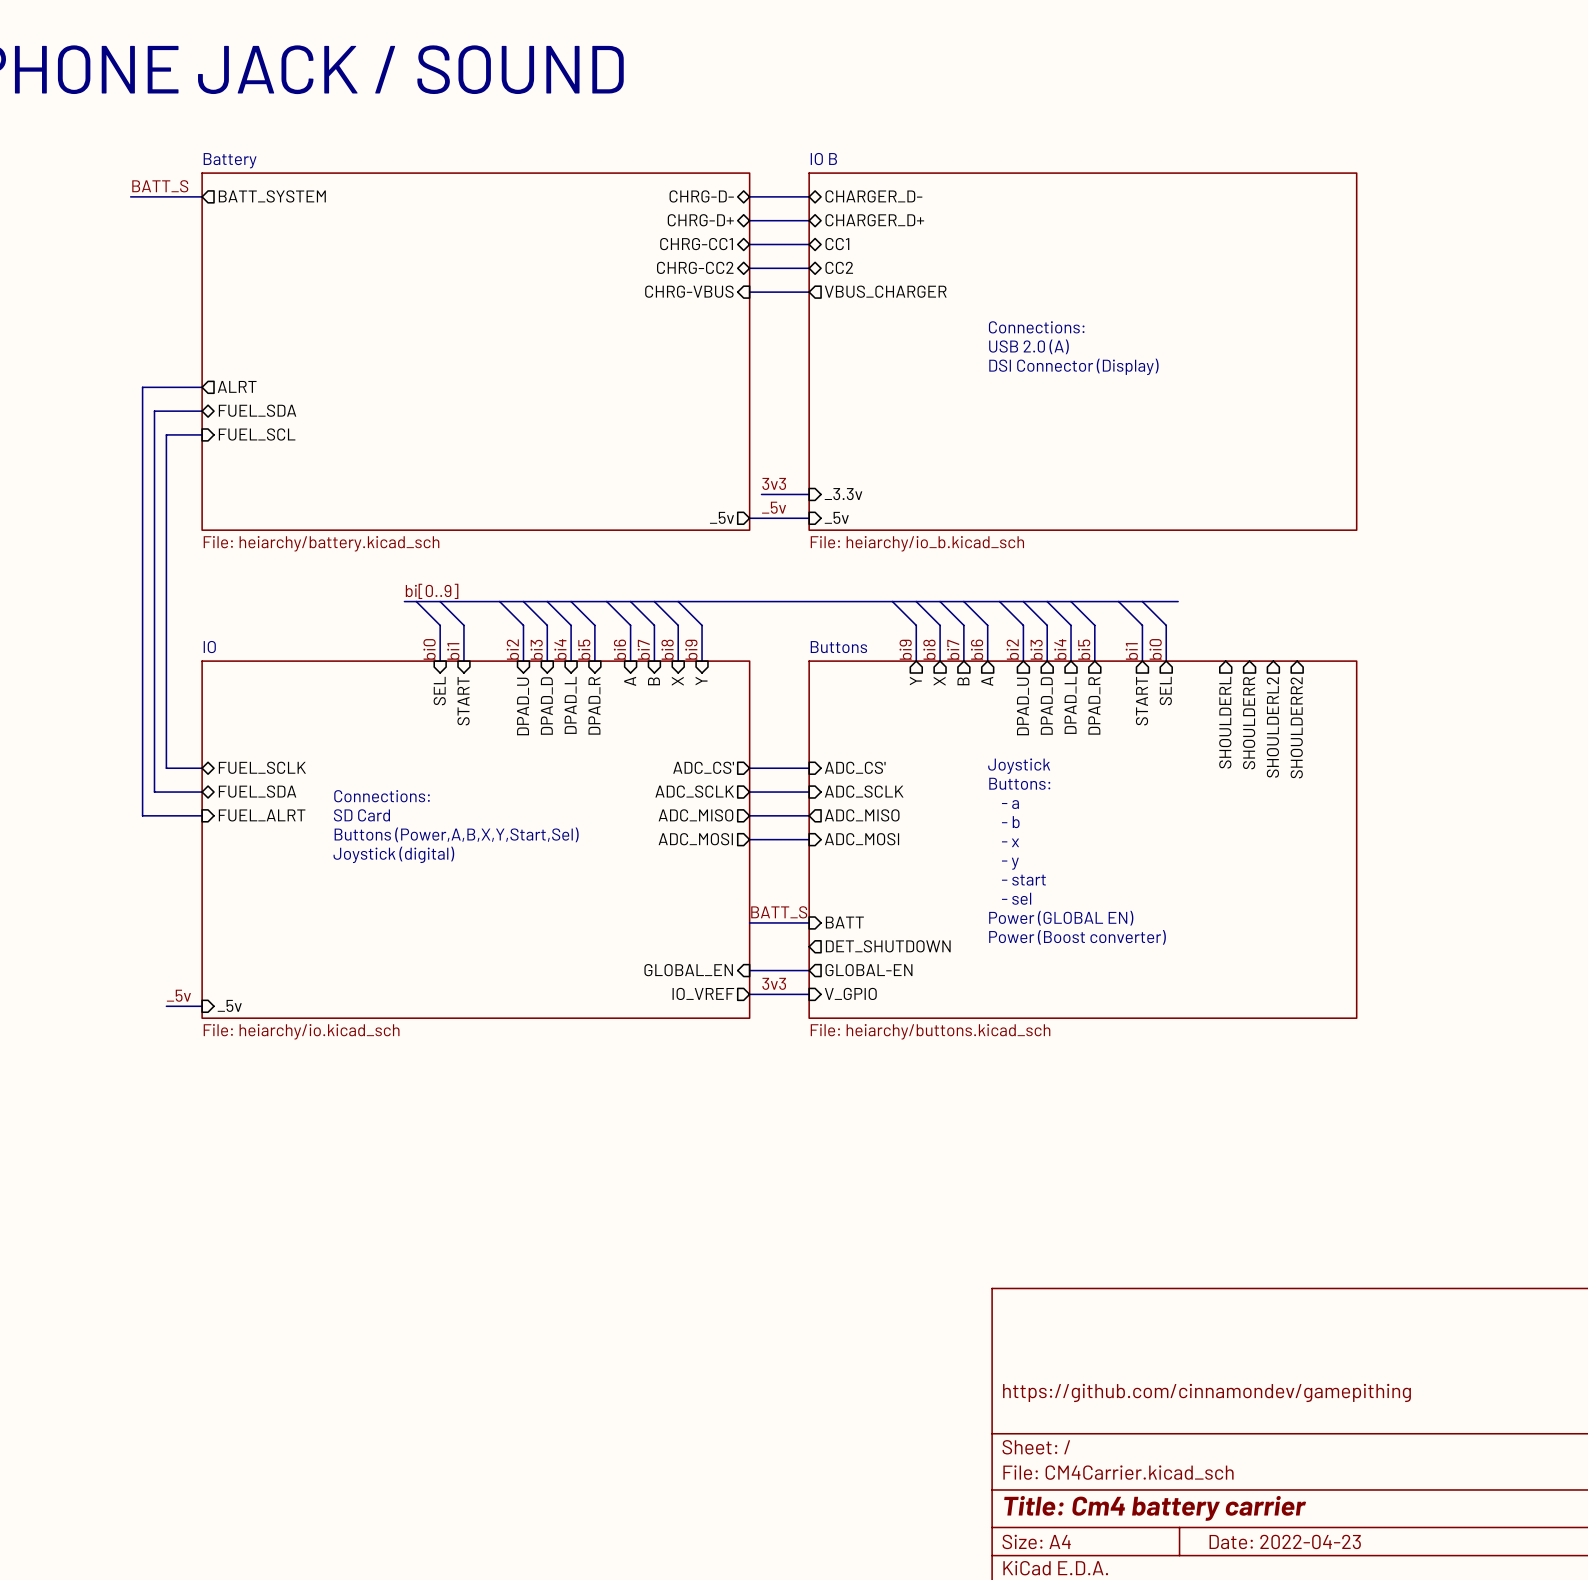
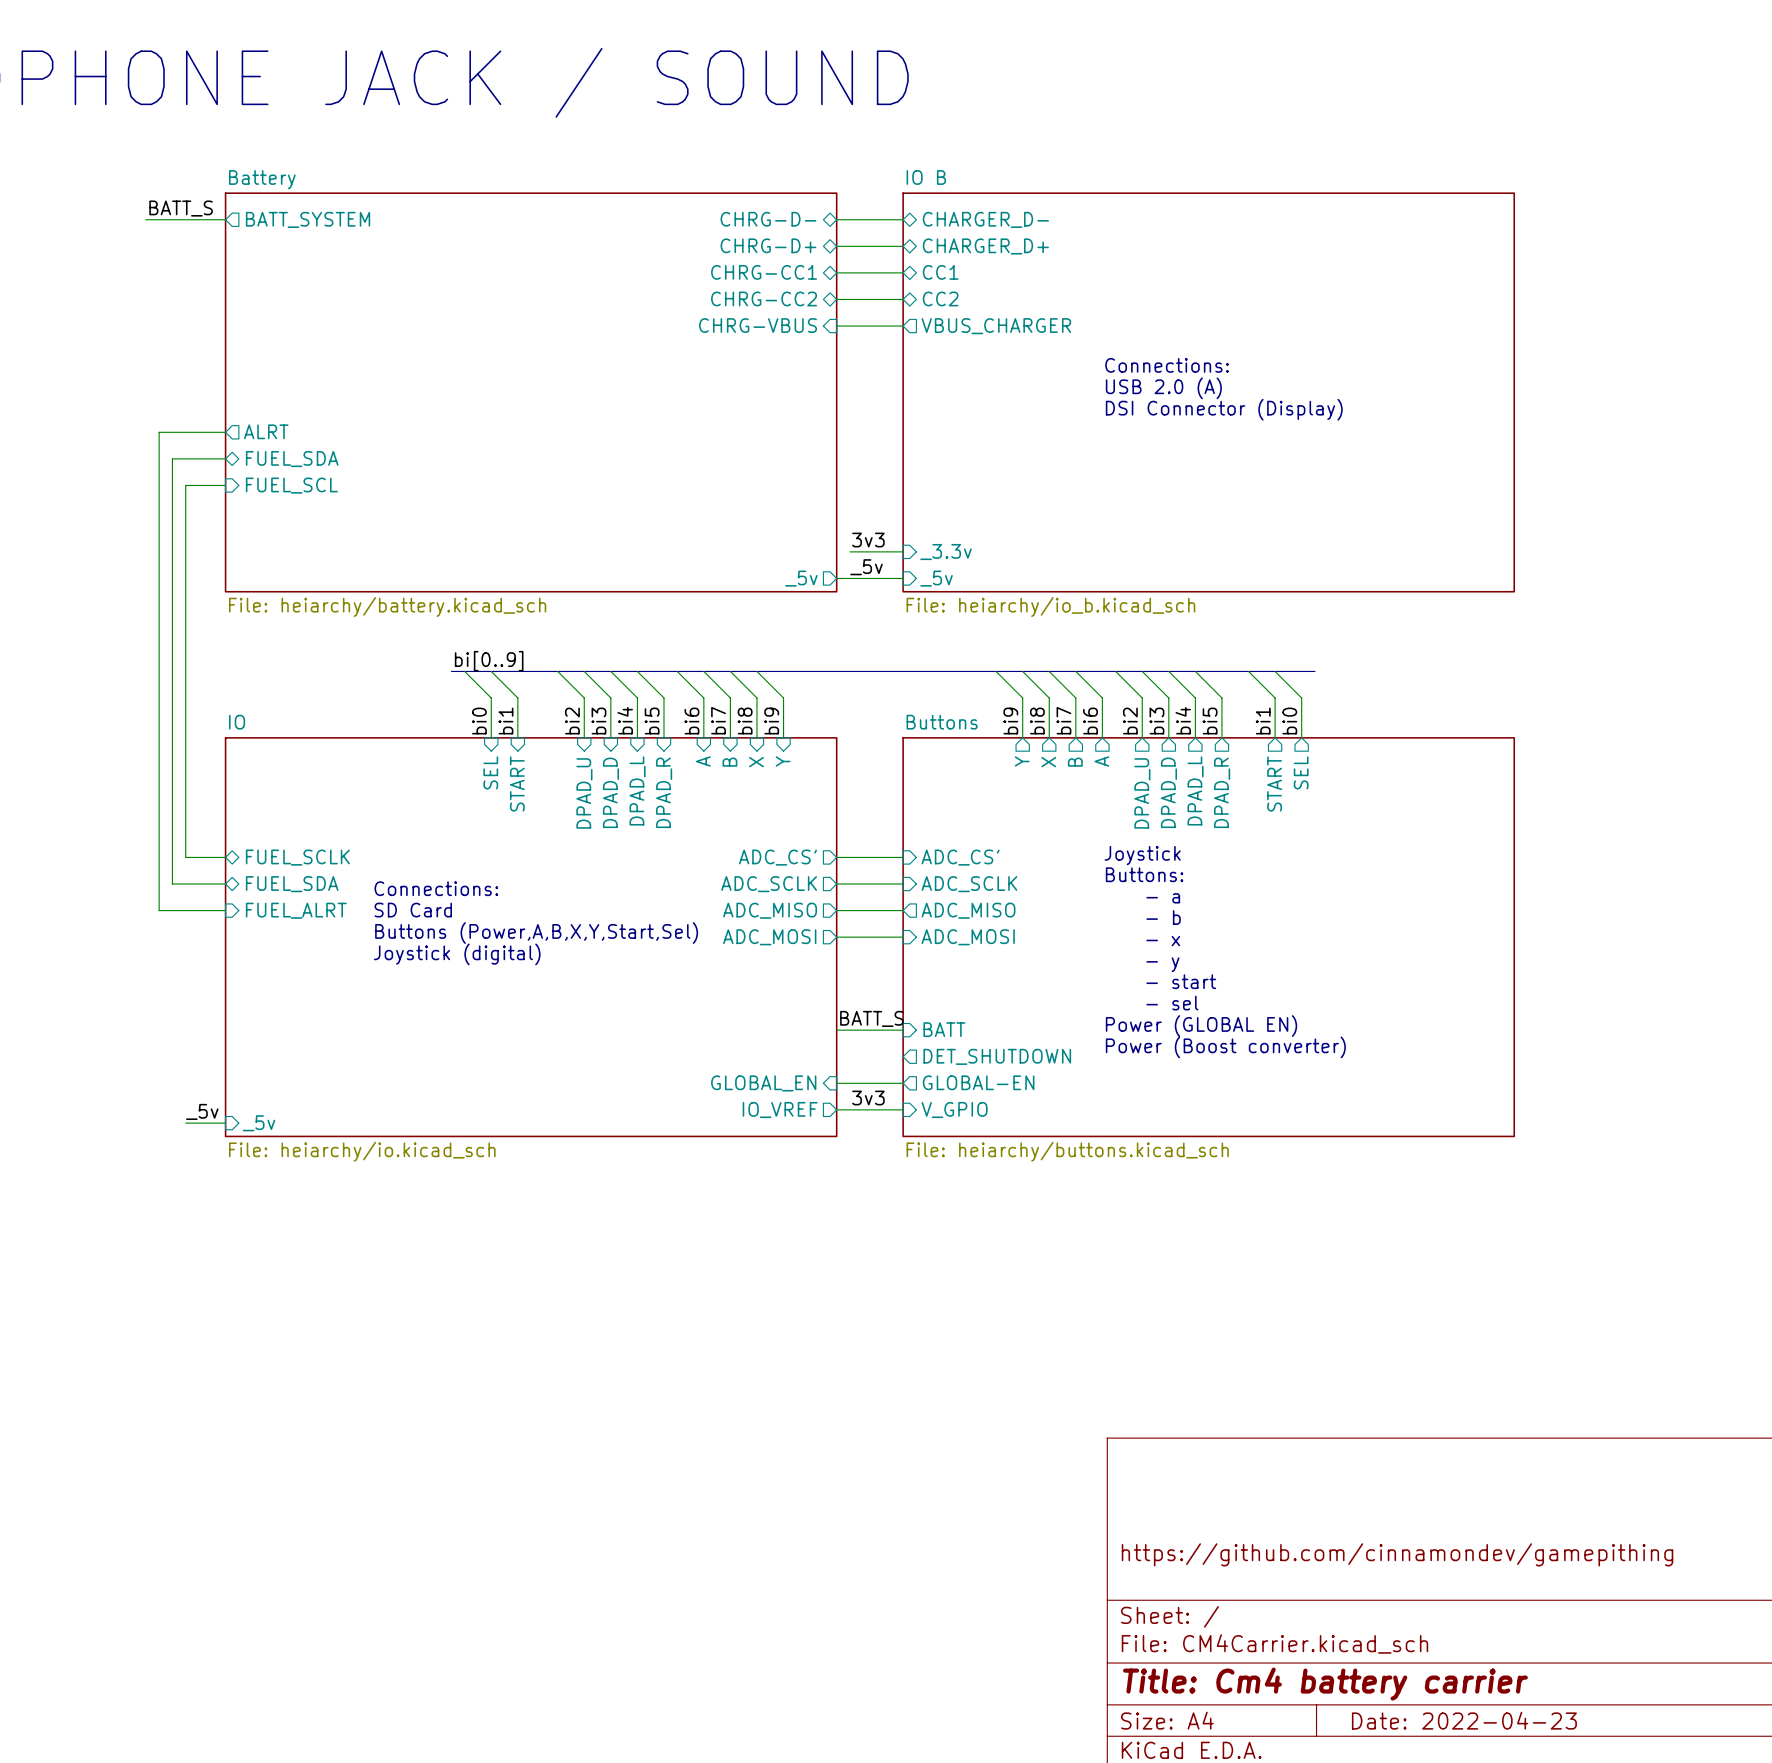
sheet pin: SHOULDERL (1225, 722) -> none
sheet pin: SHOULDERR (1249, 723) -> none
sheet pin: SHOULDERL2 (1272, 727) -> none
sheet pin: SHOULDERR2 (1296, 727) -> none

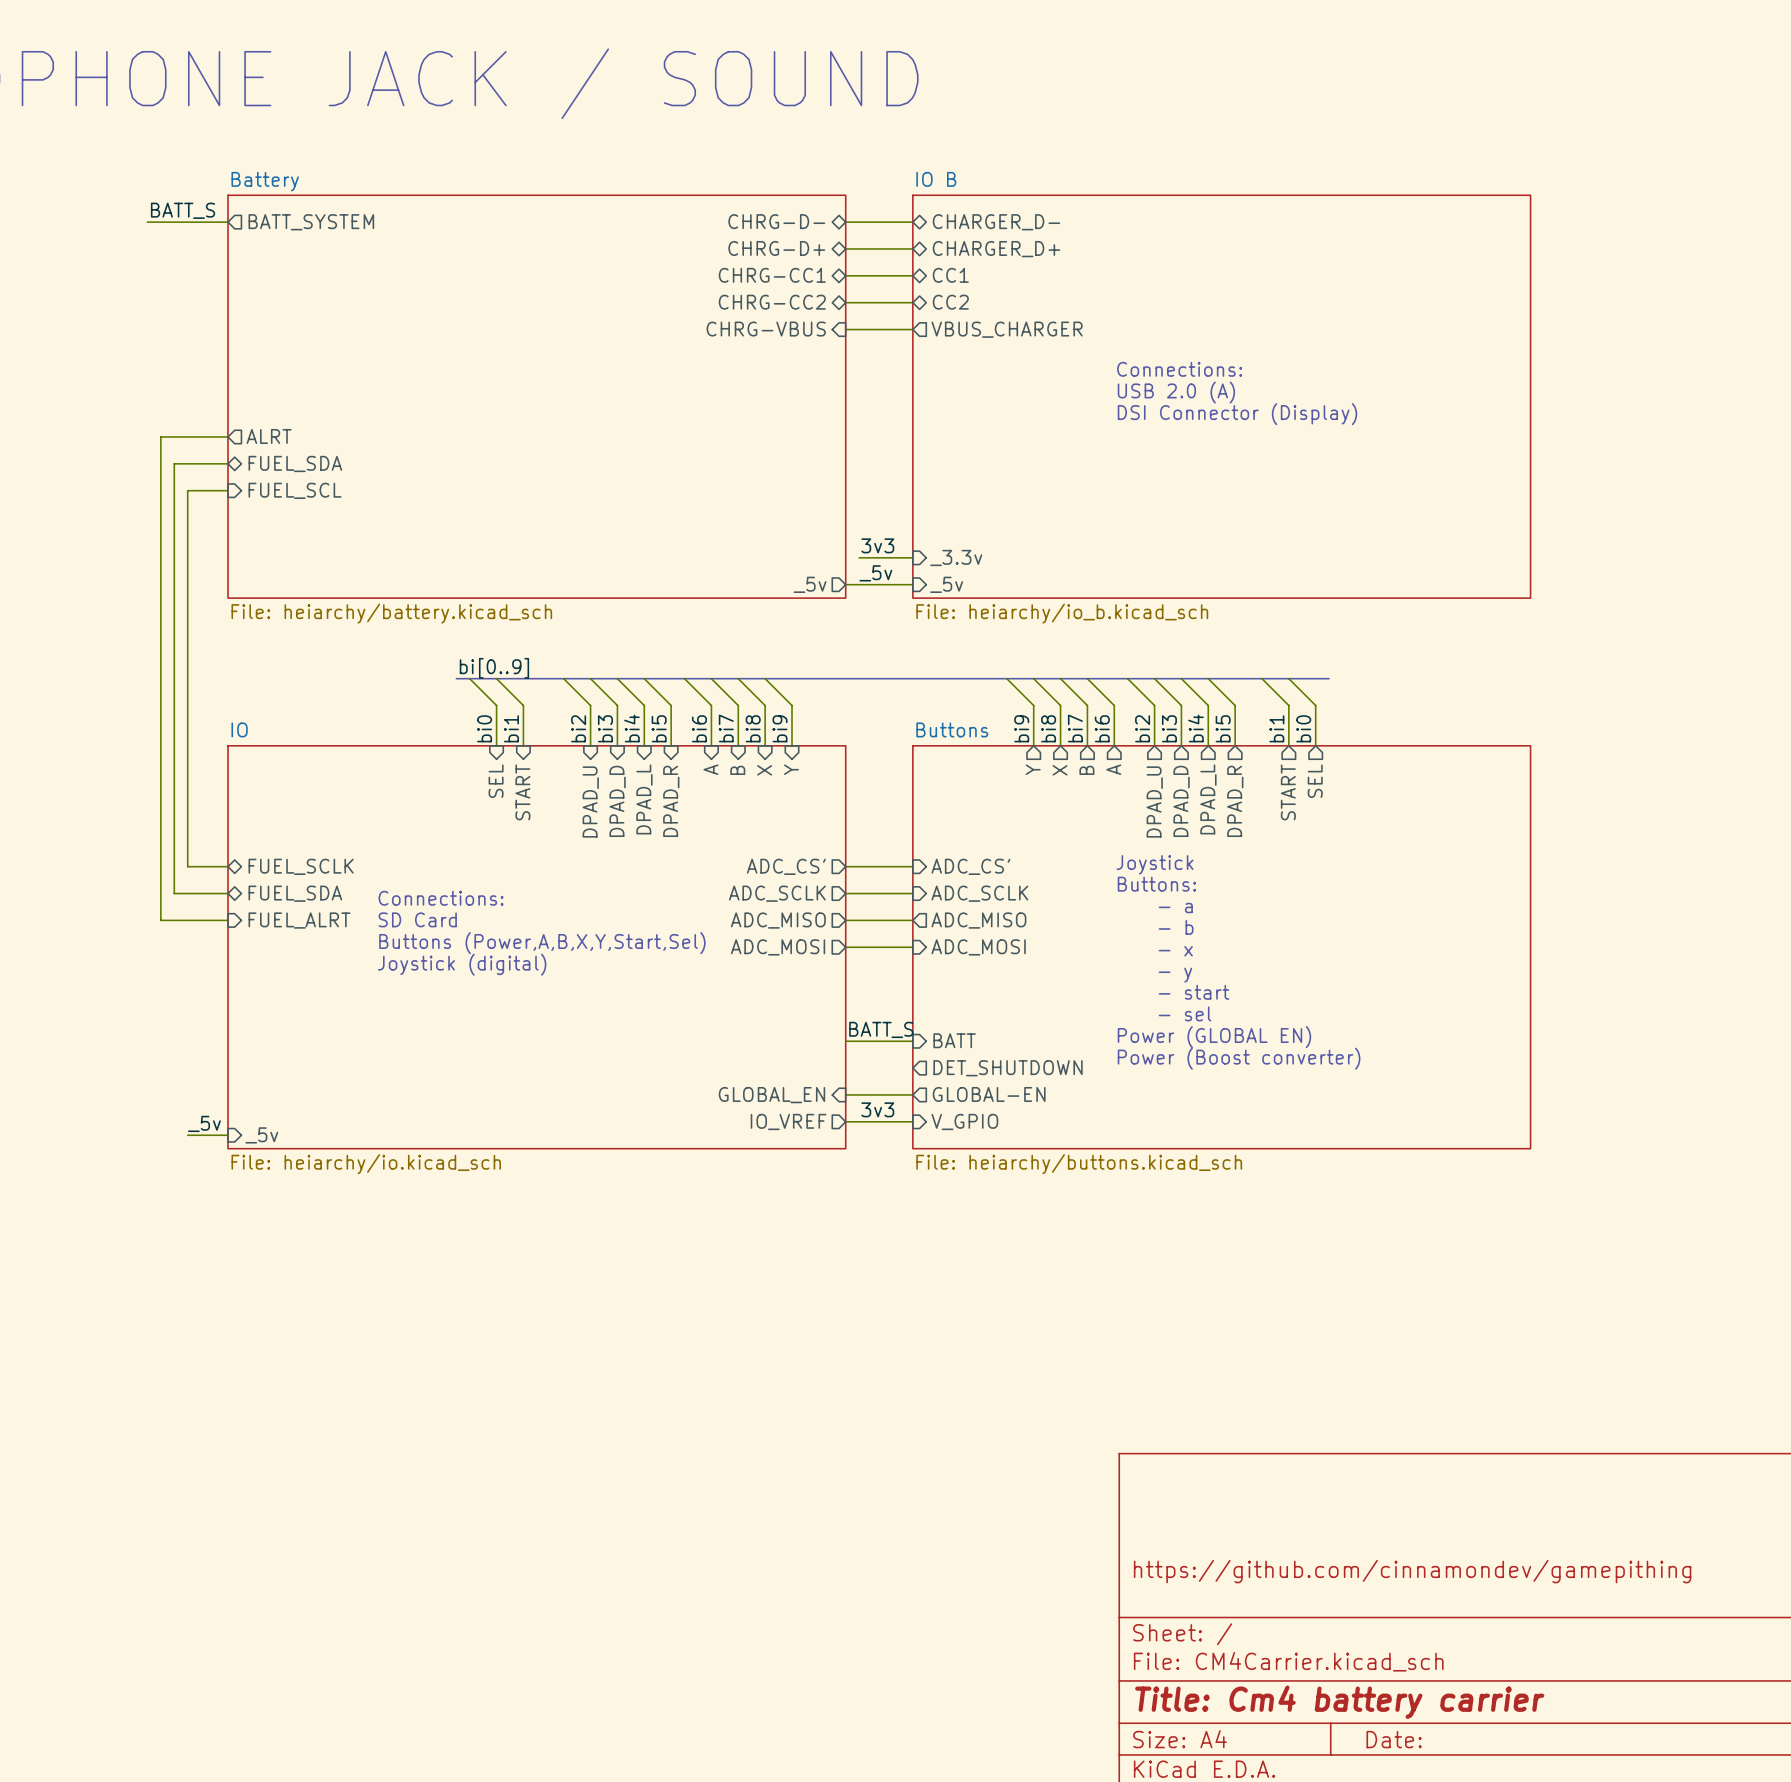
title block: Date: 2022-04-23 (1464, 1720) -> Date: (1394, 1739)

